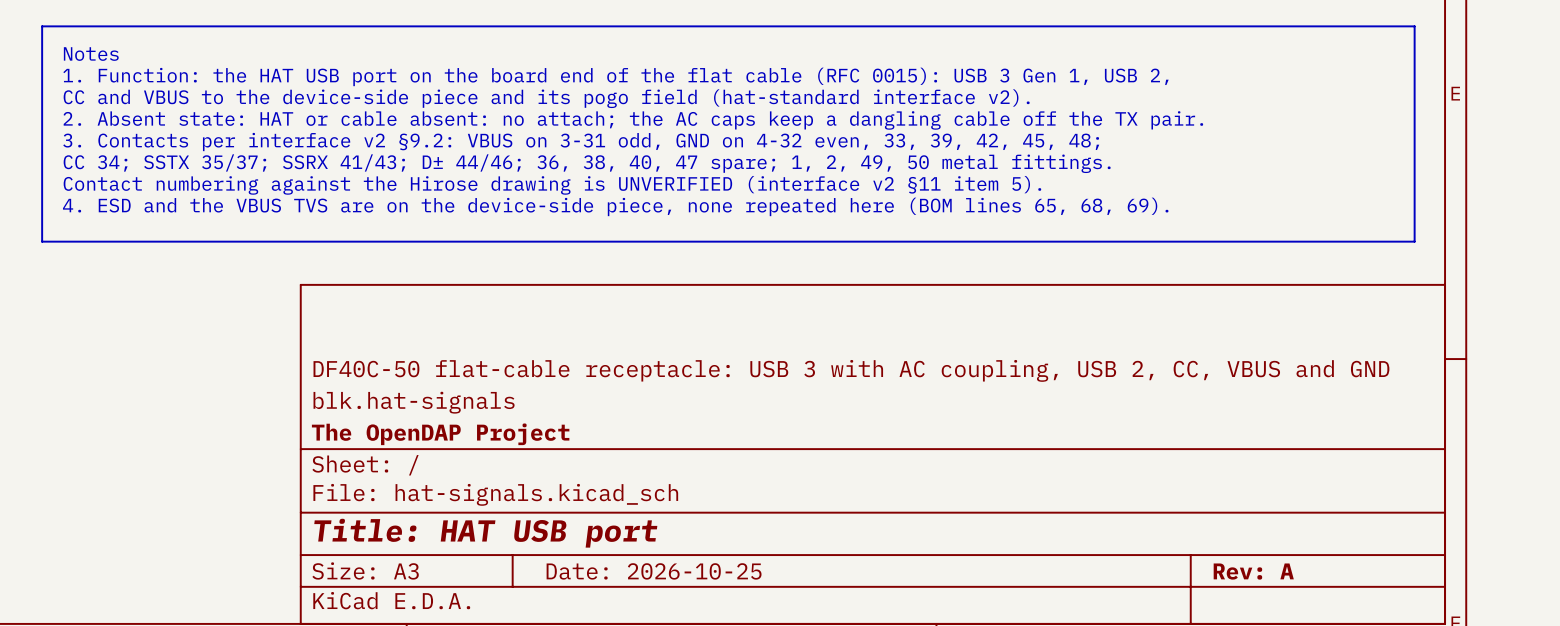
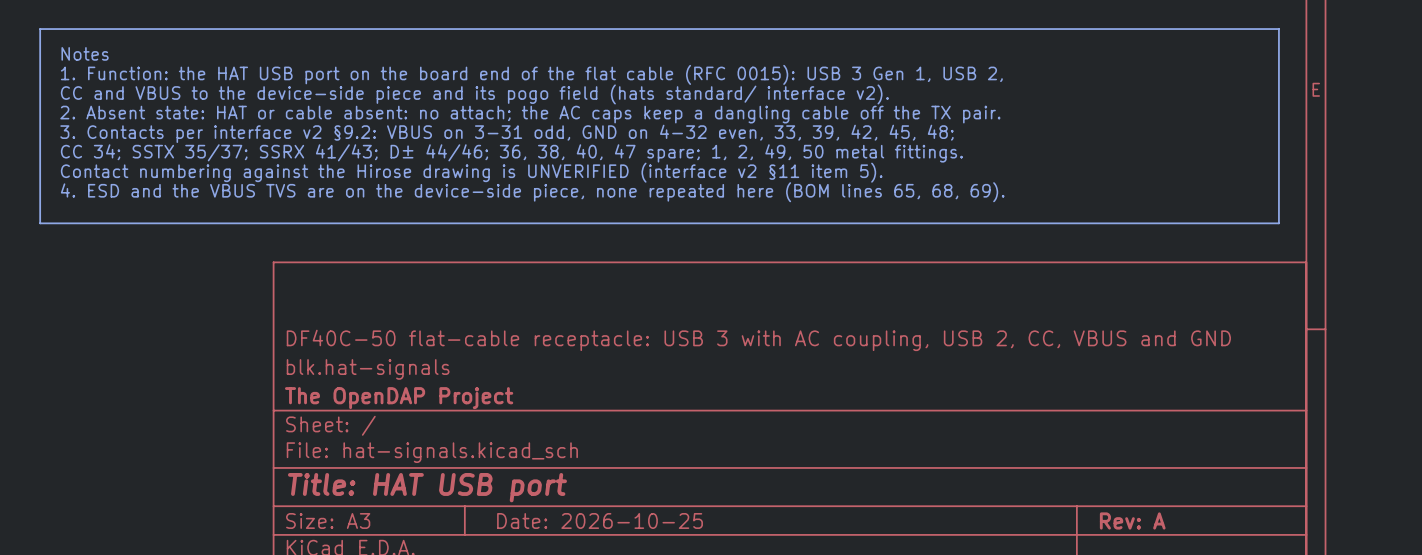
text: CC and VBUS to the device-side piece and its pogo field (hat-standard interface v2). (546, 98) -> CC and VBUS to the device-side piece and its pogo field (hats standard/ interface v2). (474, 94)

